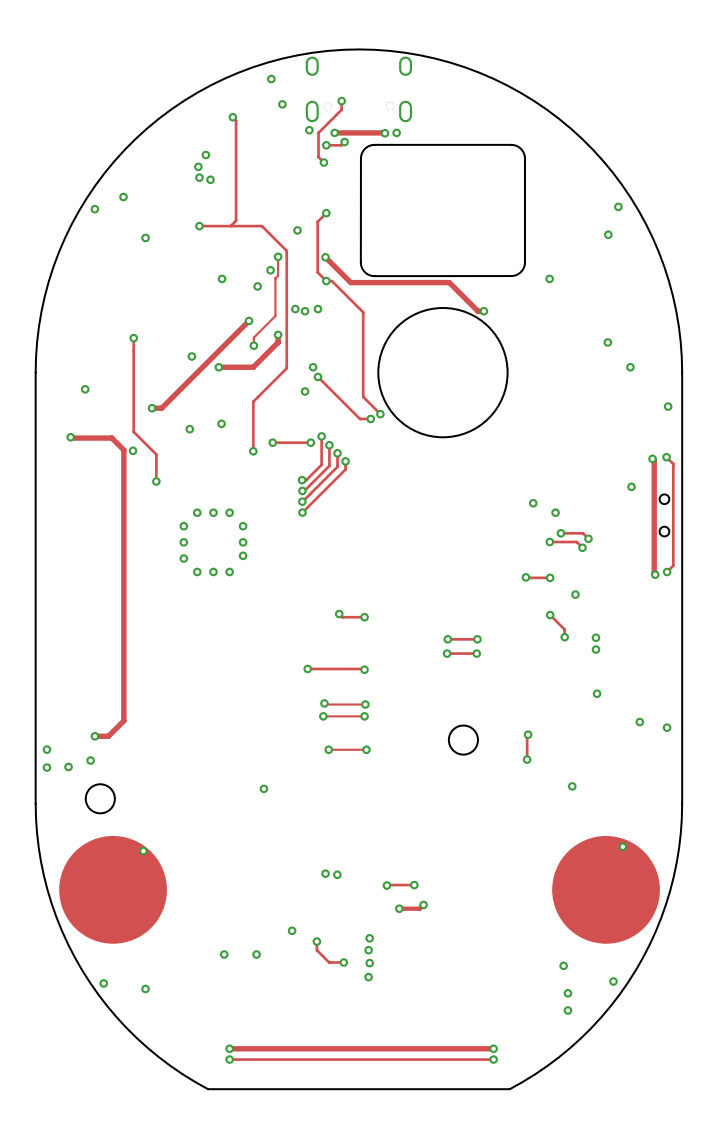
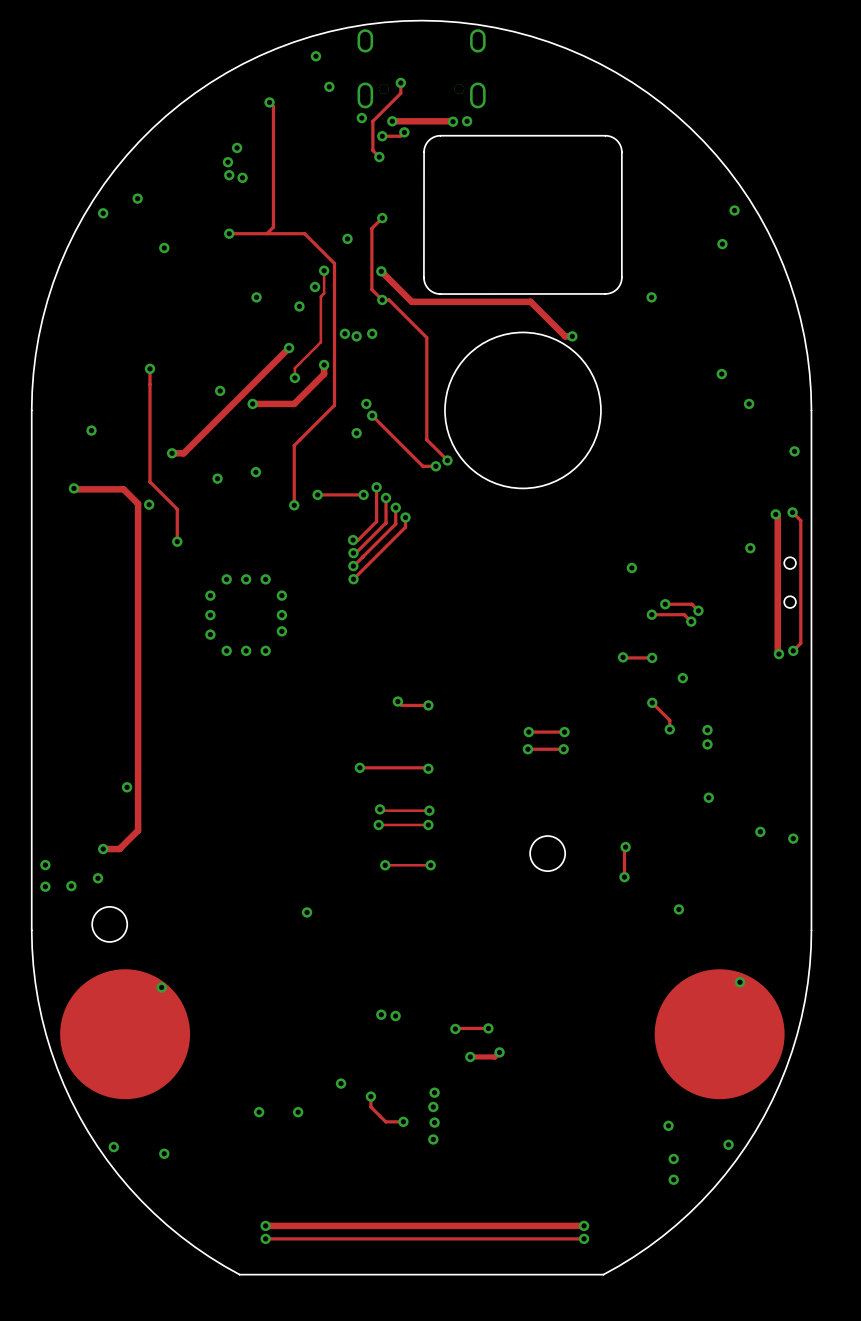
via: (555, 512) -> none
via: none -> (127, 787)

